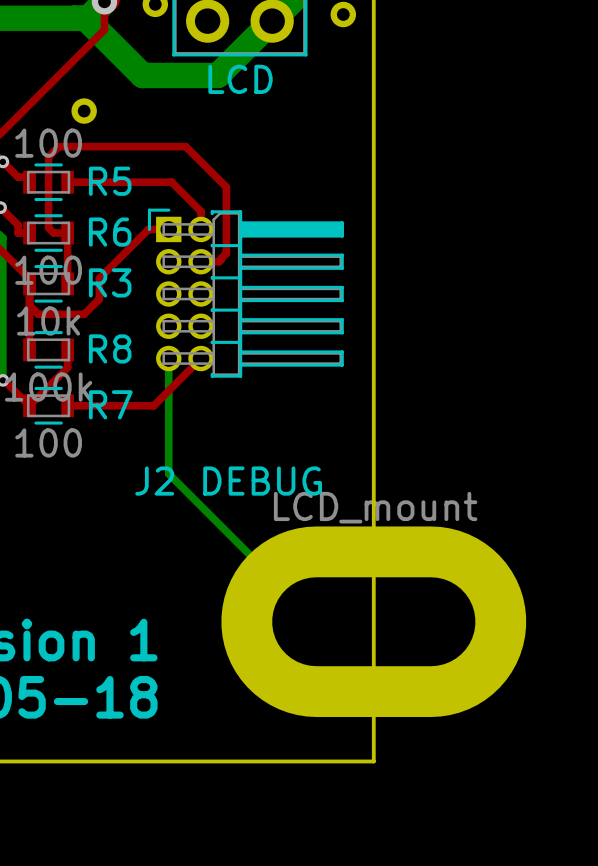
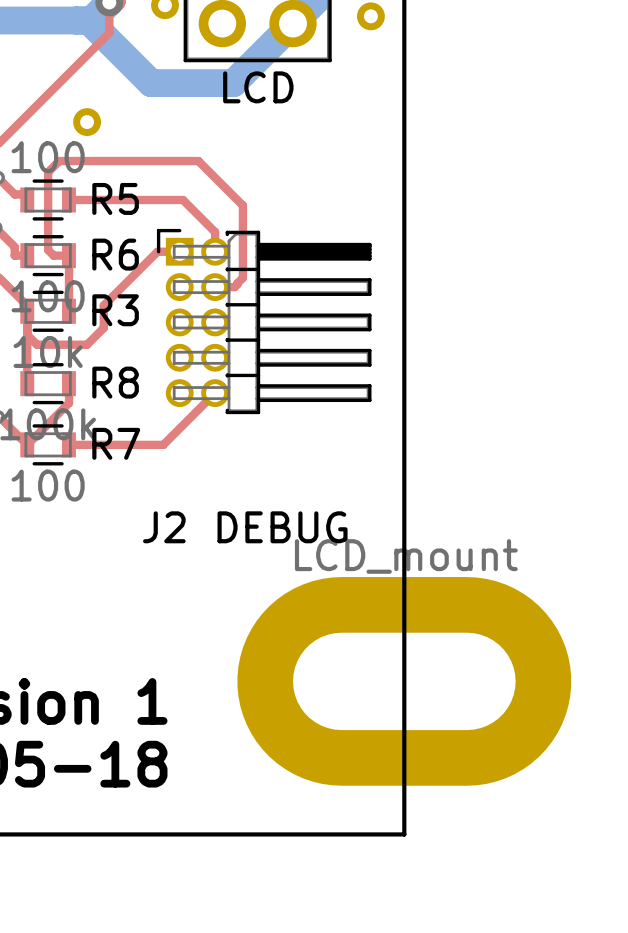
bottom track: (168, 358) (168, 473) (316, 621) (373, 621) -> none

